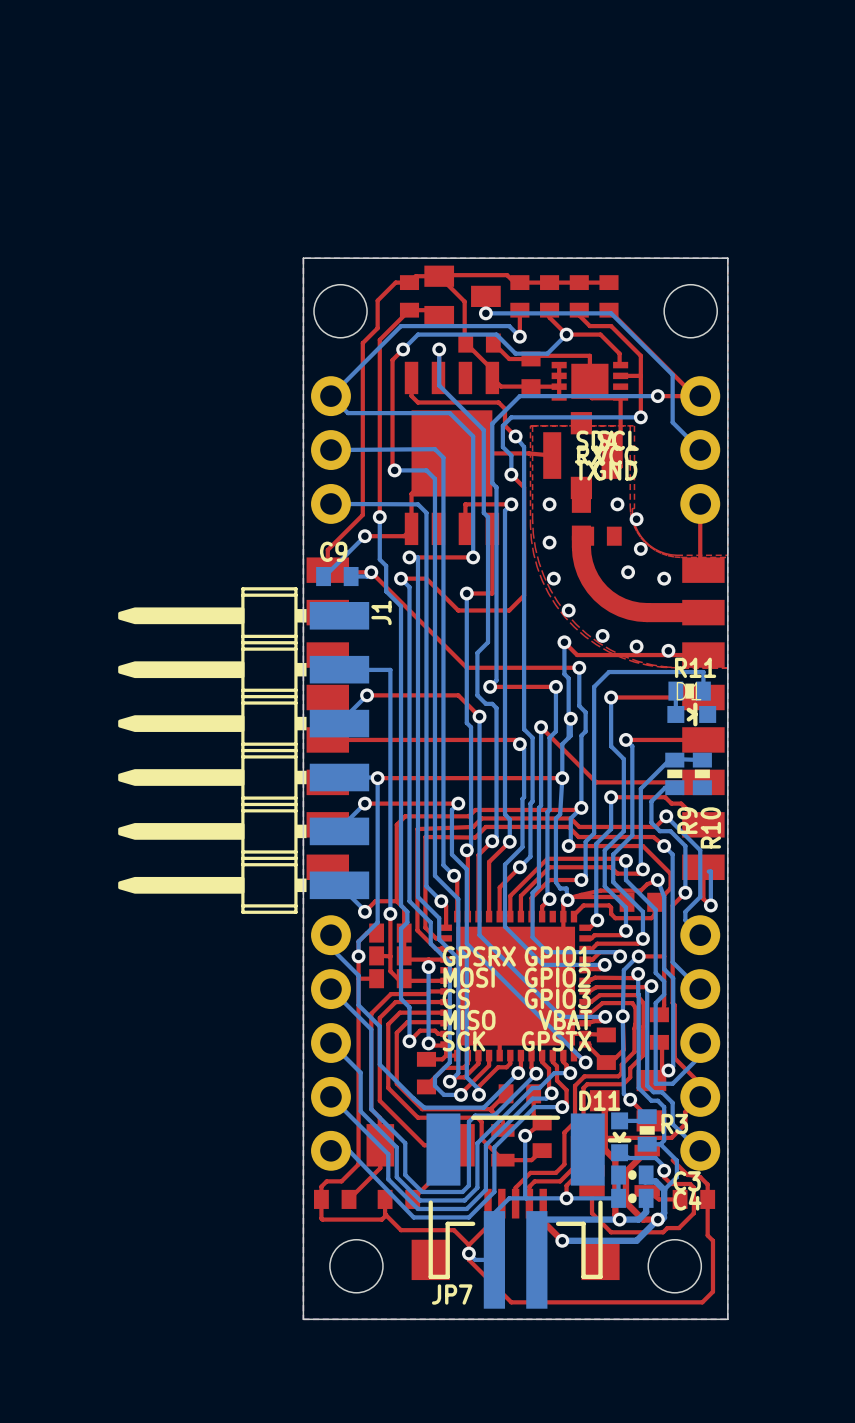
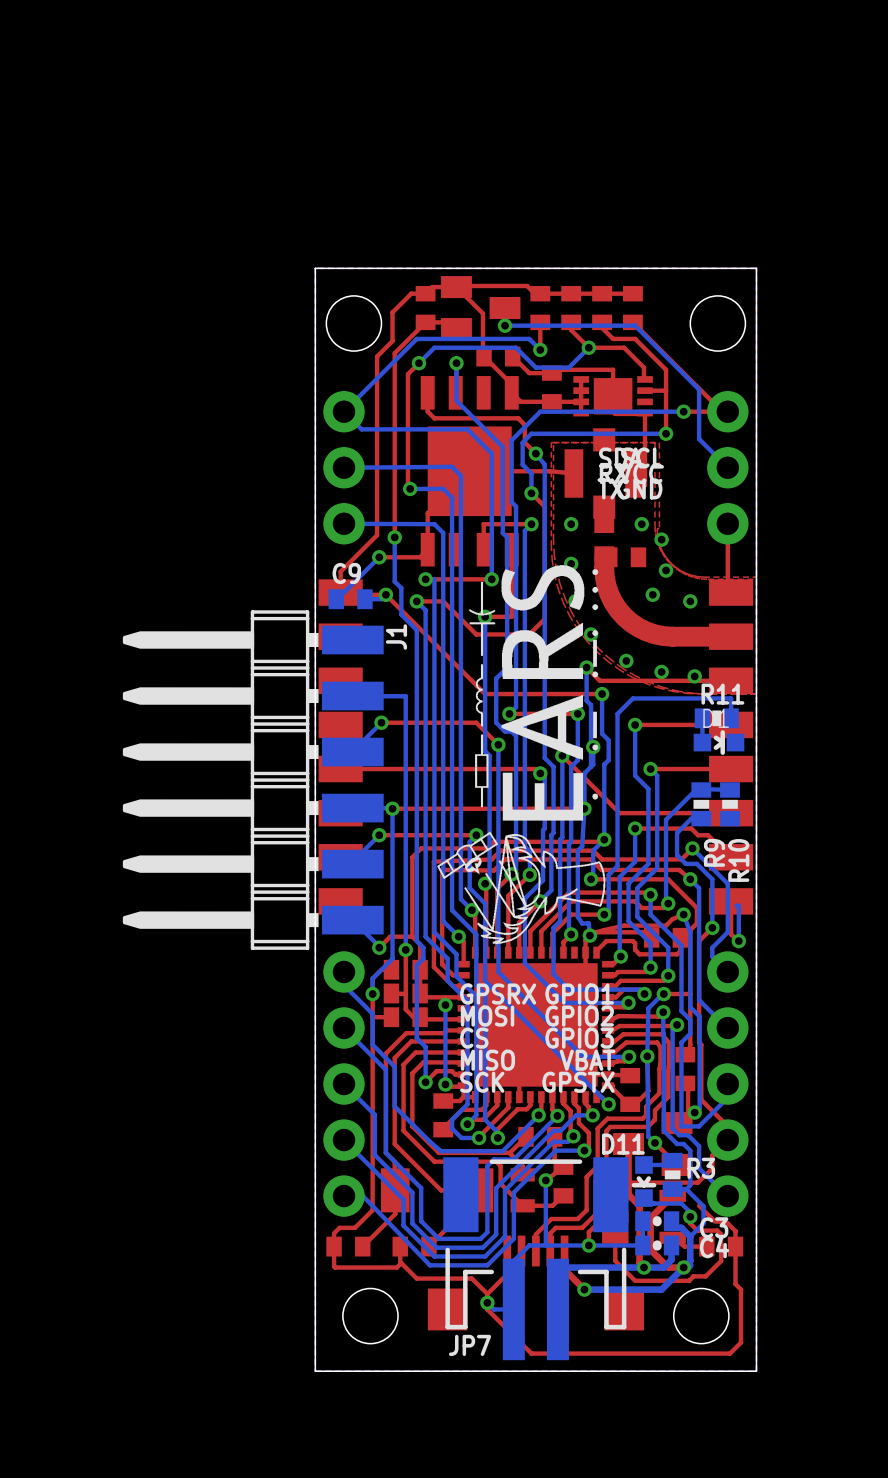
drawing: none -> [437, 565, 606, 945]

